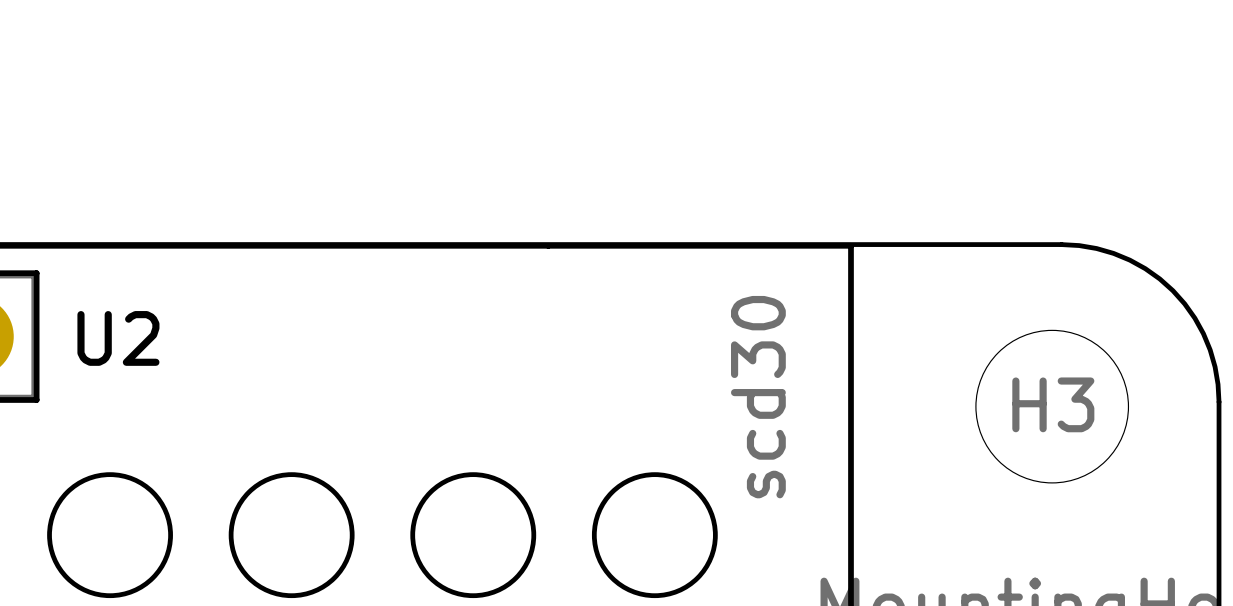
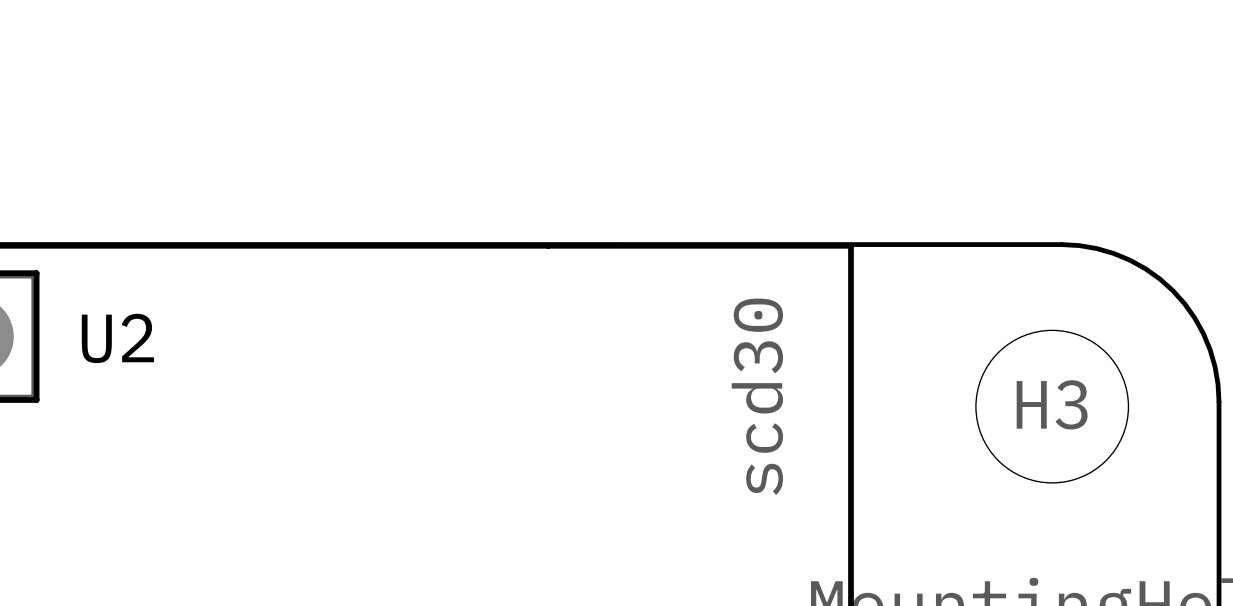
round board edge: [47, 472, 173, 599] -> none
round board edge: [228, 472, 355, 599] -> none
round board edge: [410, 472, 537, 599] -> none
round board edge: [591, 472, 718, 599] -> none

